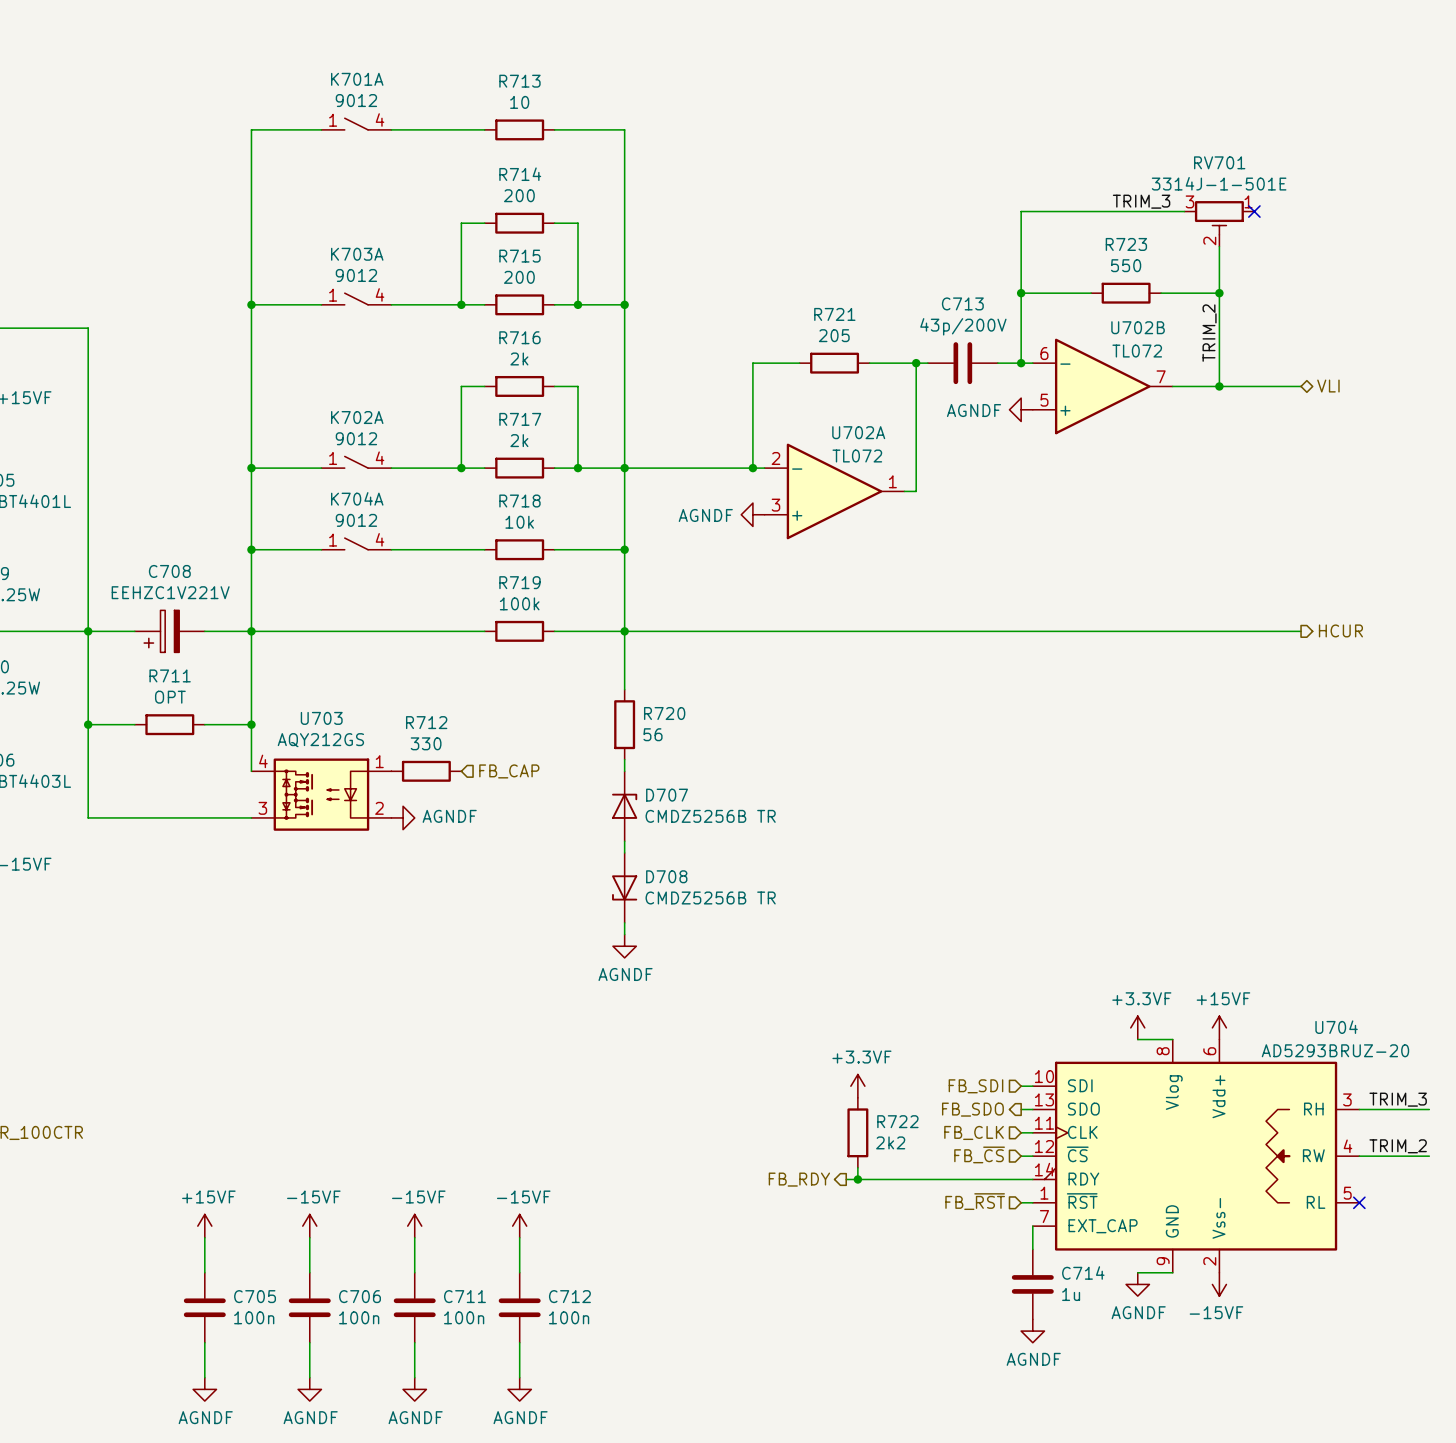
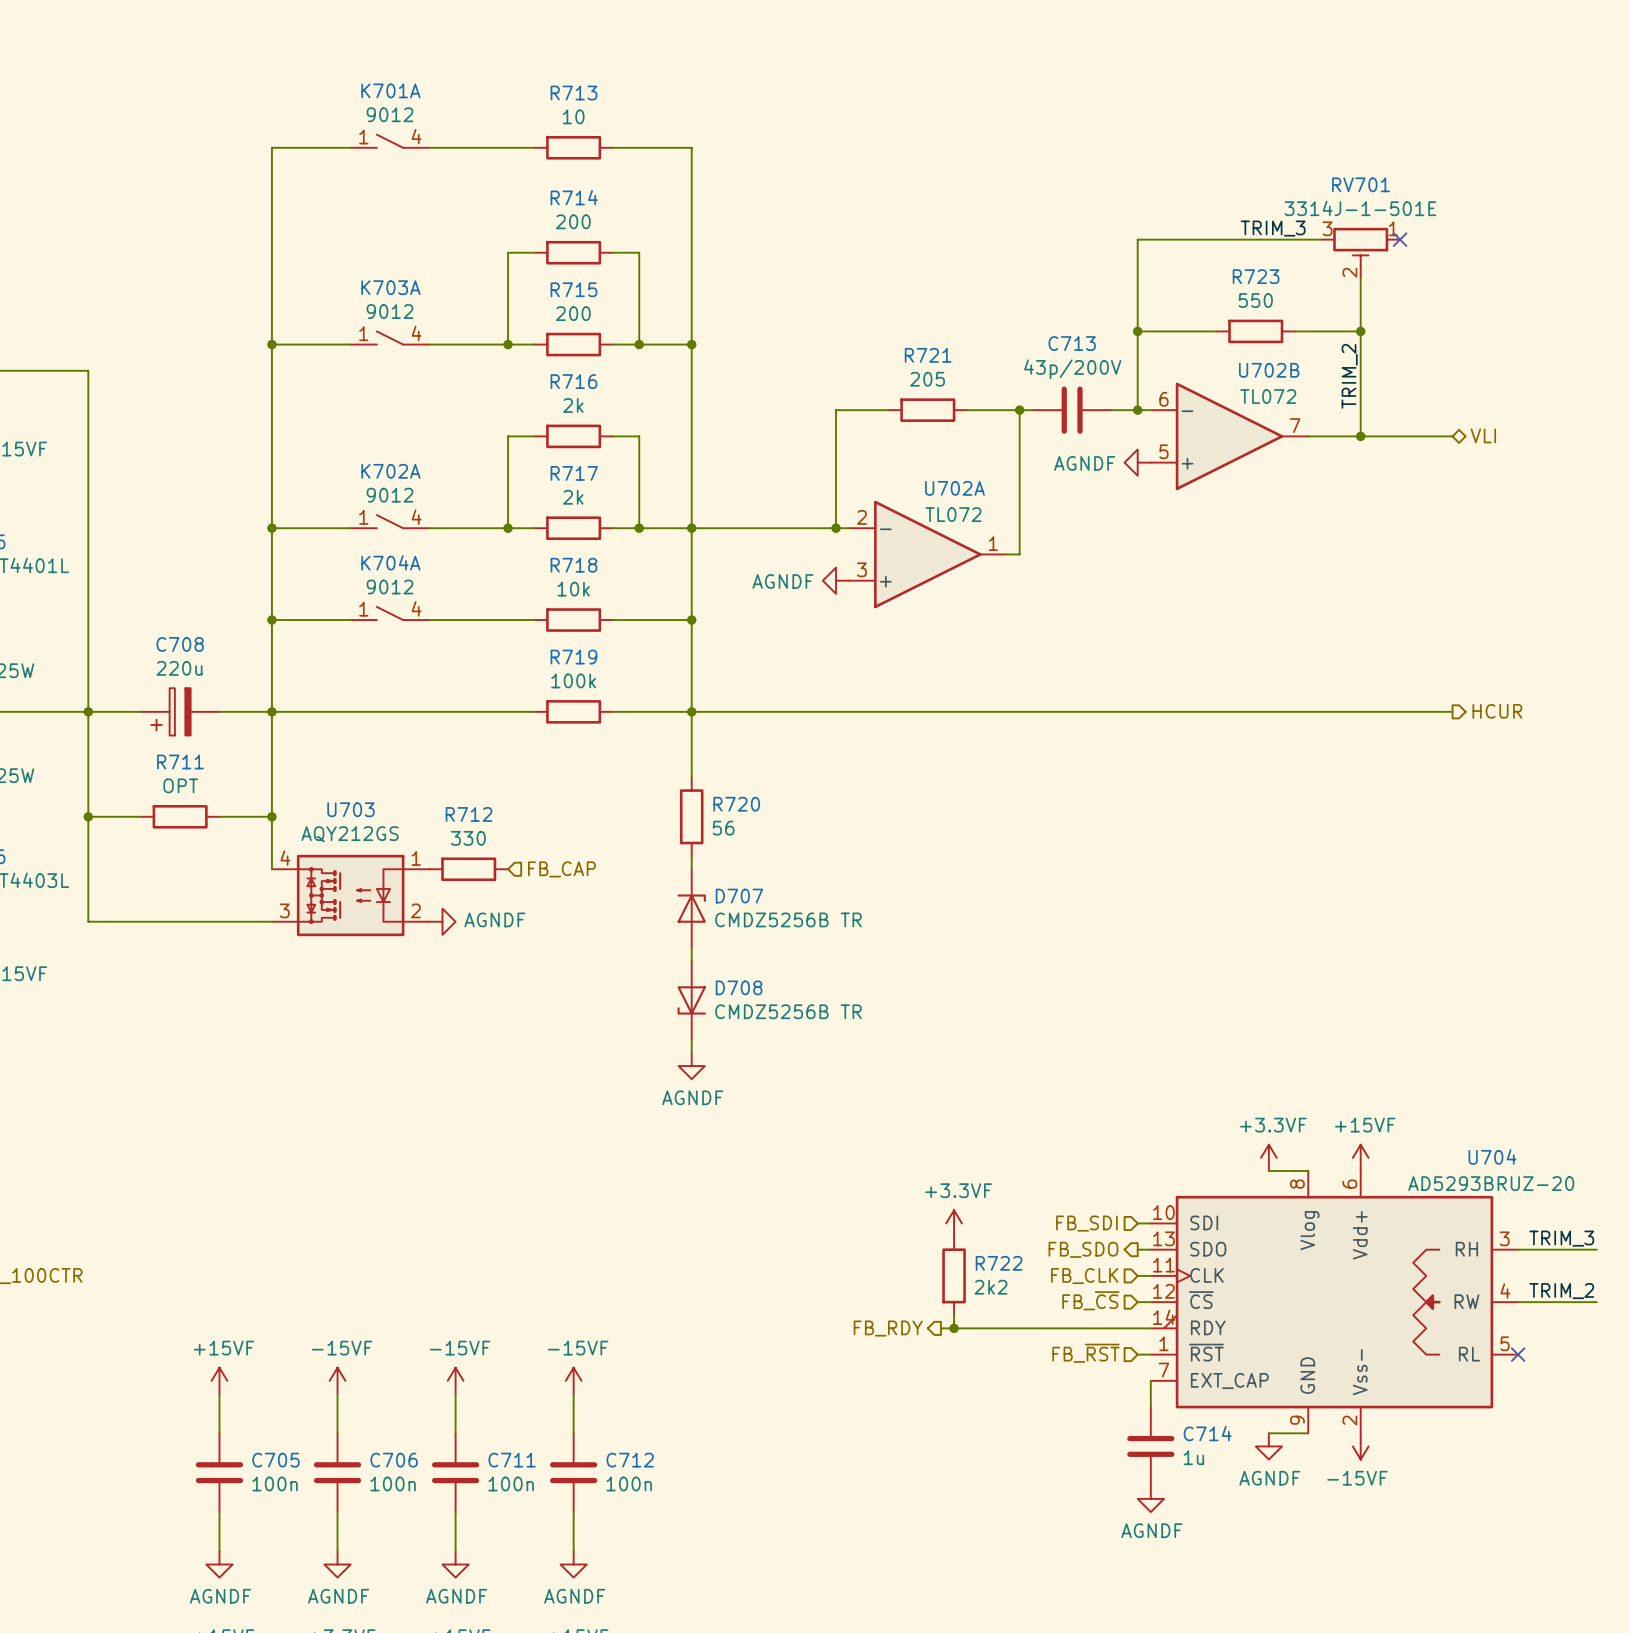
C708 value: EEHZC1V221V (170, 592) -> 220u (179, 668)

